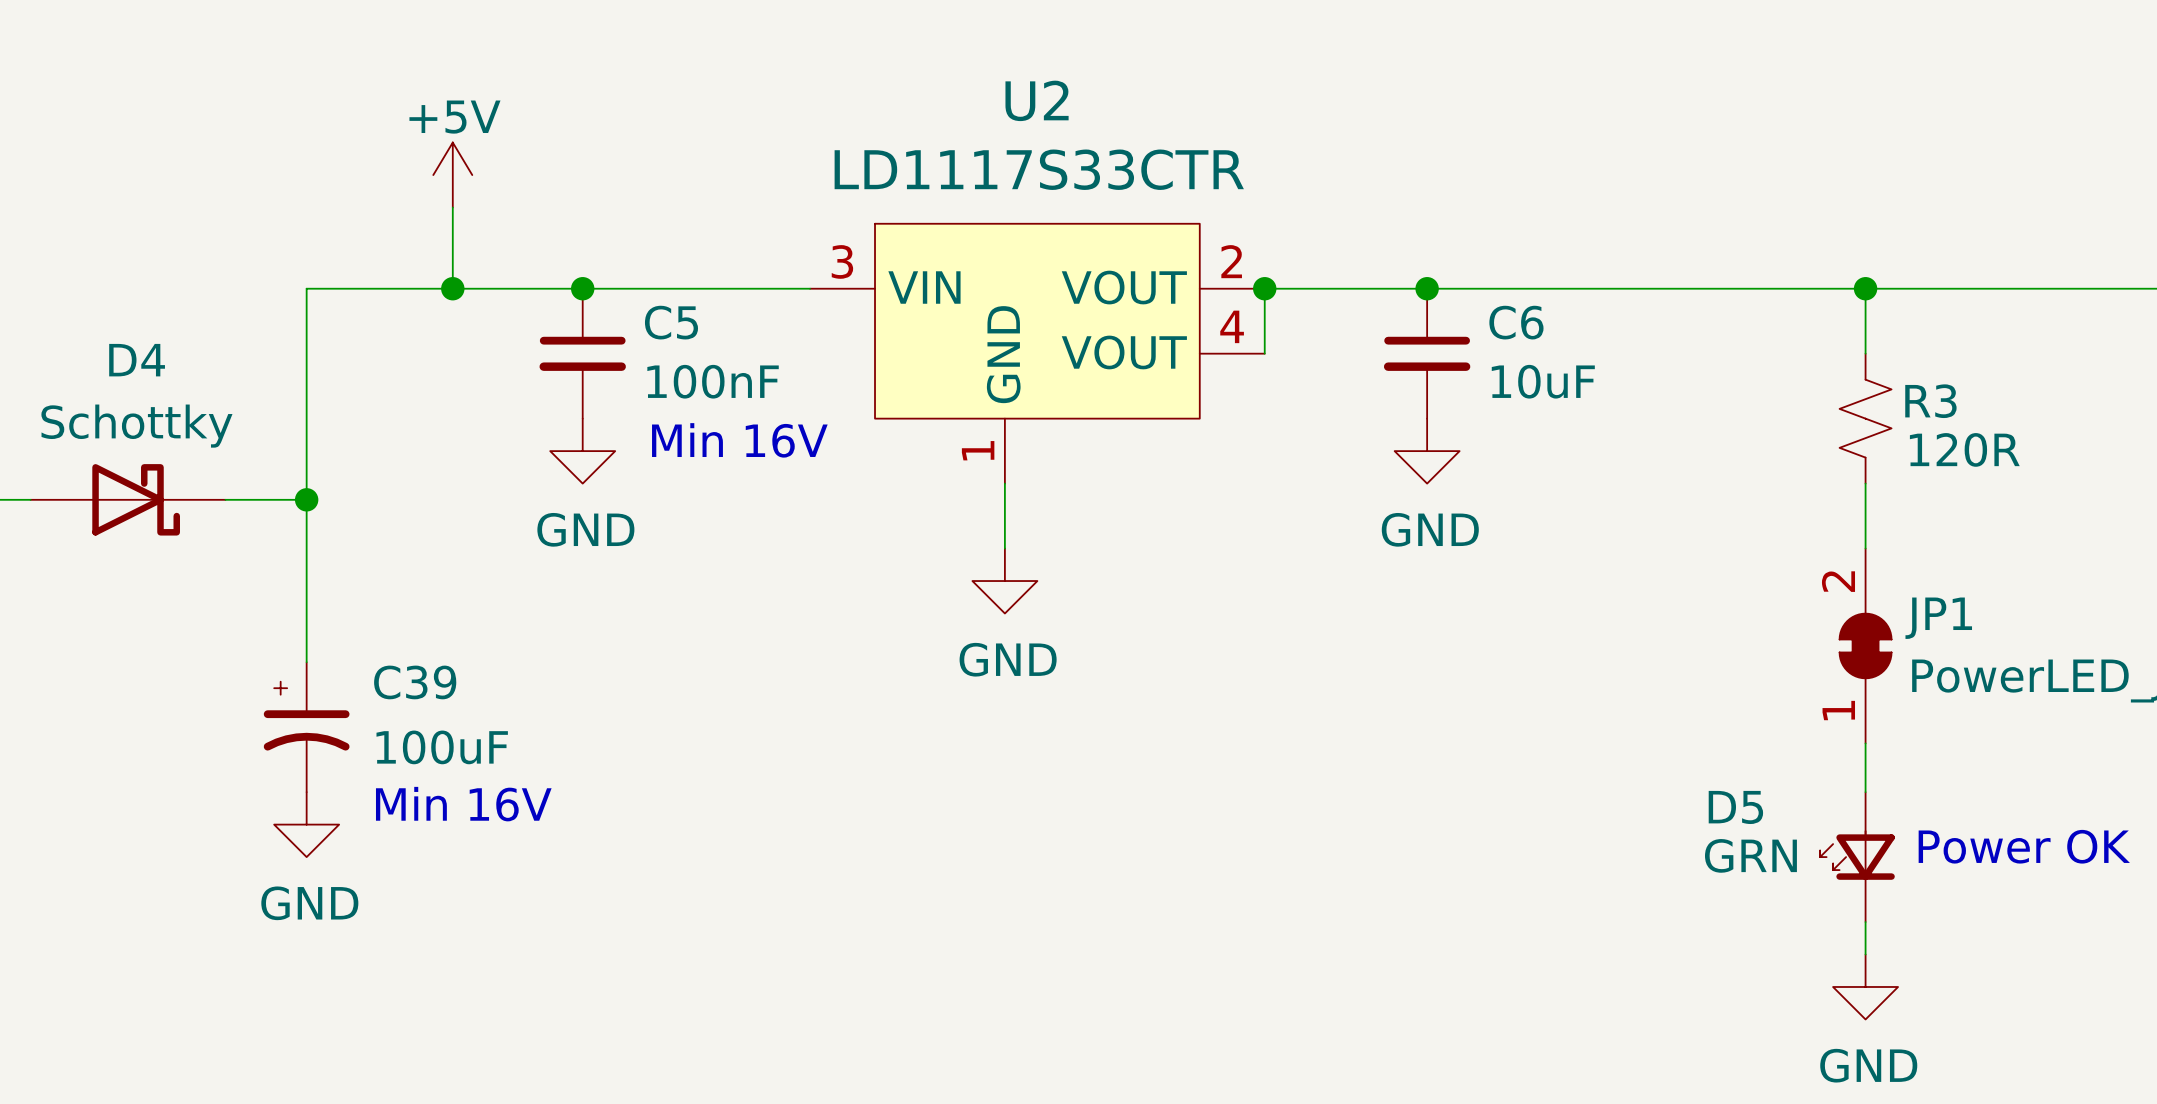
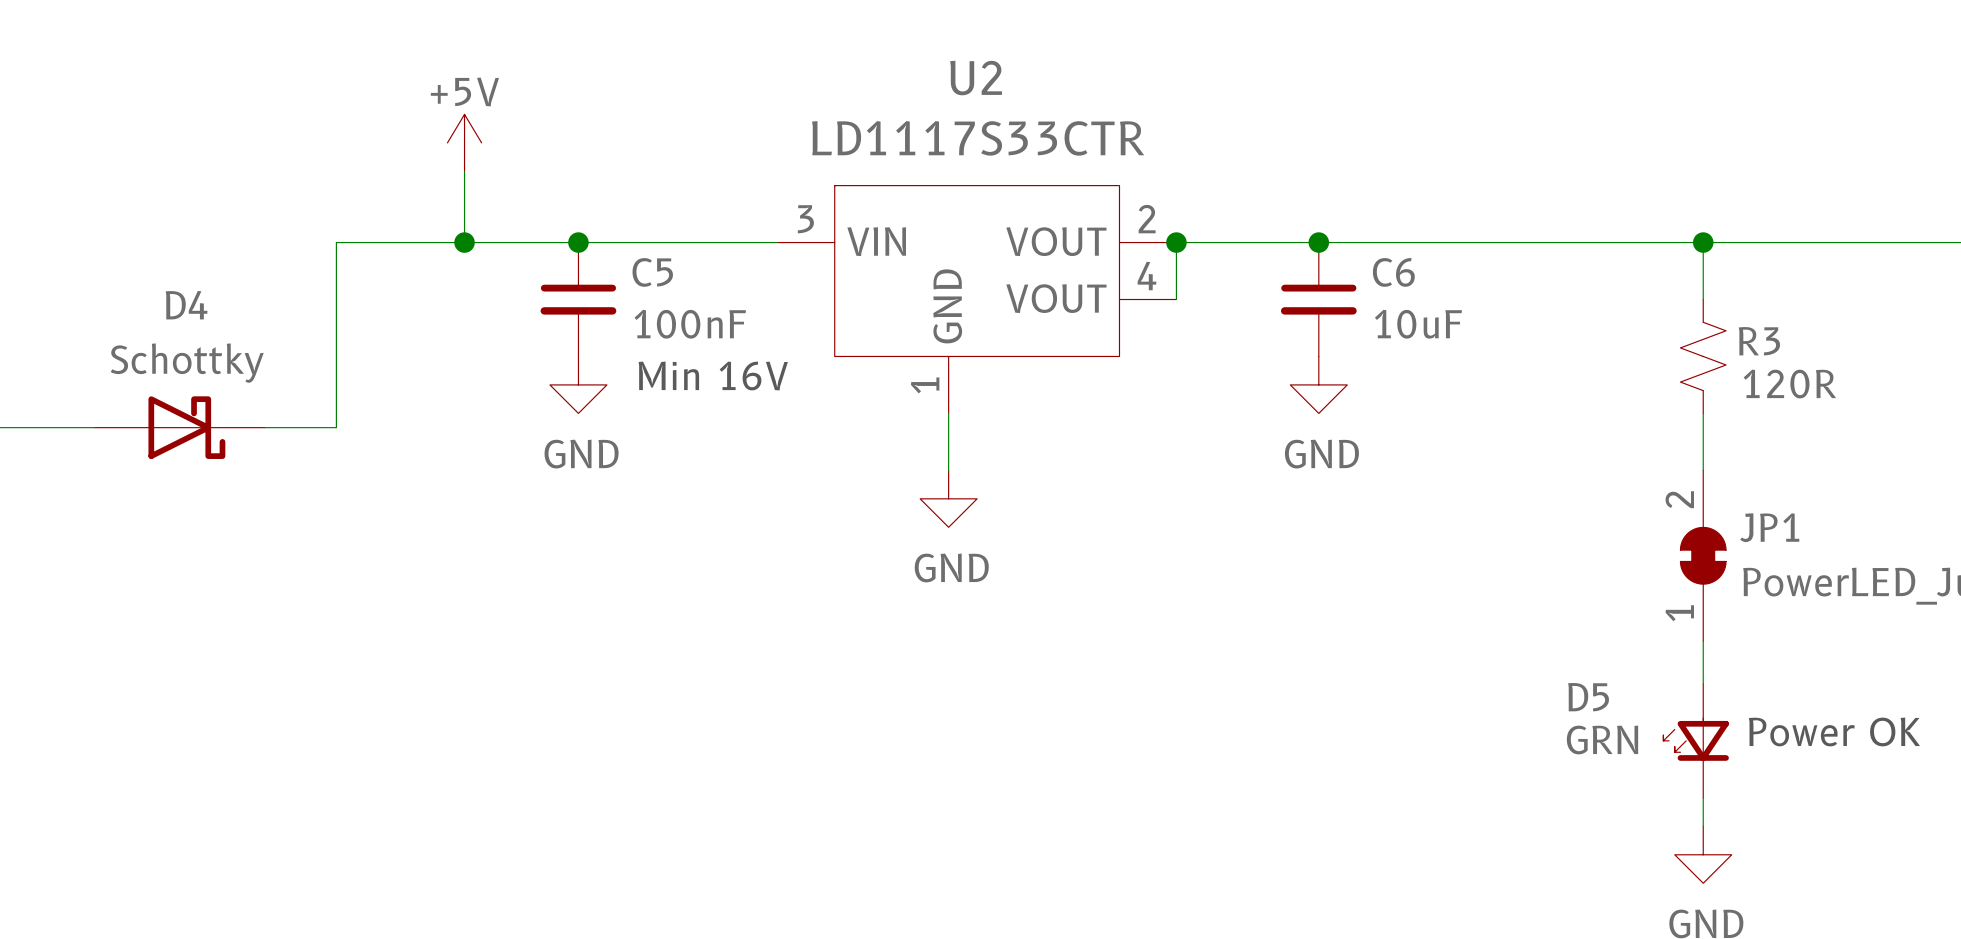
wire: (306, 499) (306, 662) -> none
junction: (306, 499) -> none
C39: 100uF (306, 727) -> none
text: Min 16V (463, 804) -> none
power symbol: GND (306, 824) -> none

